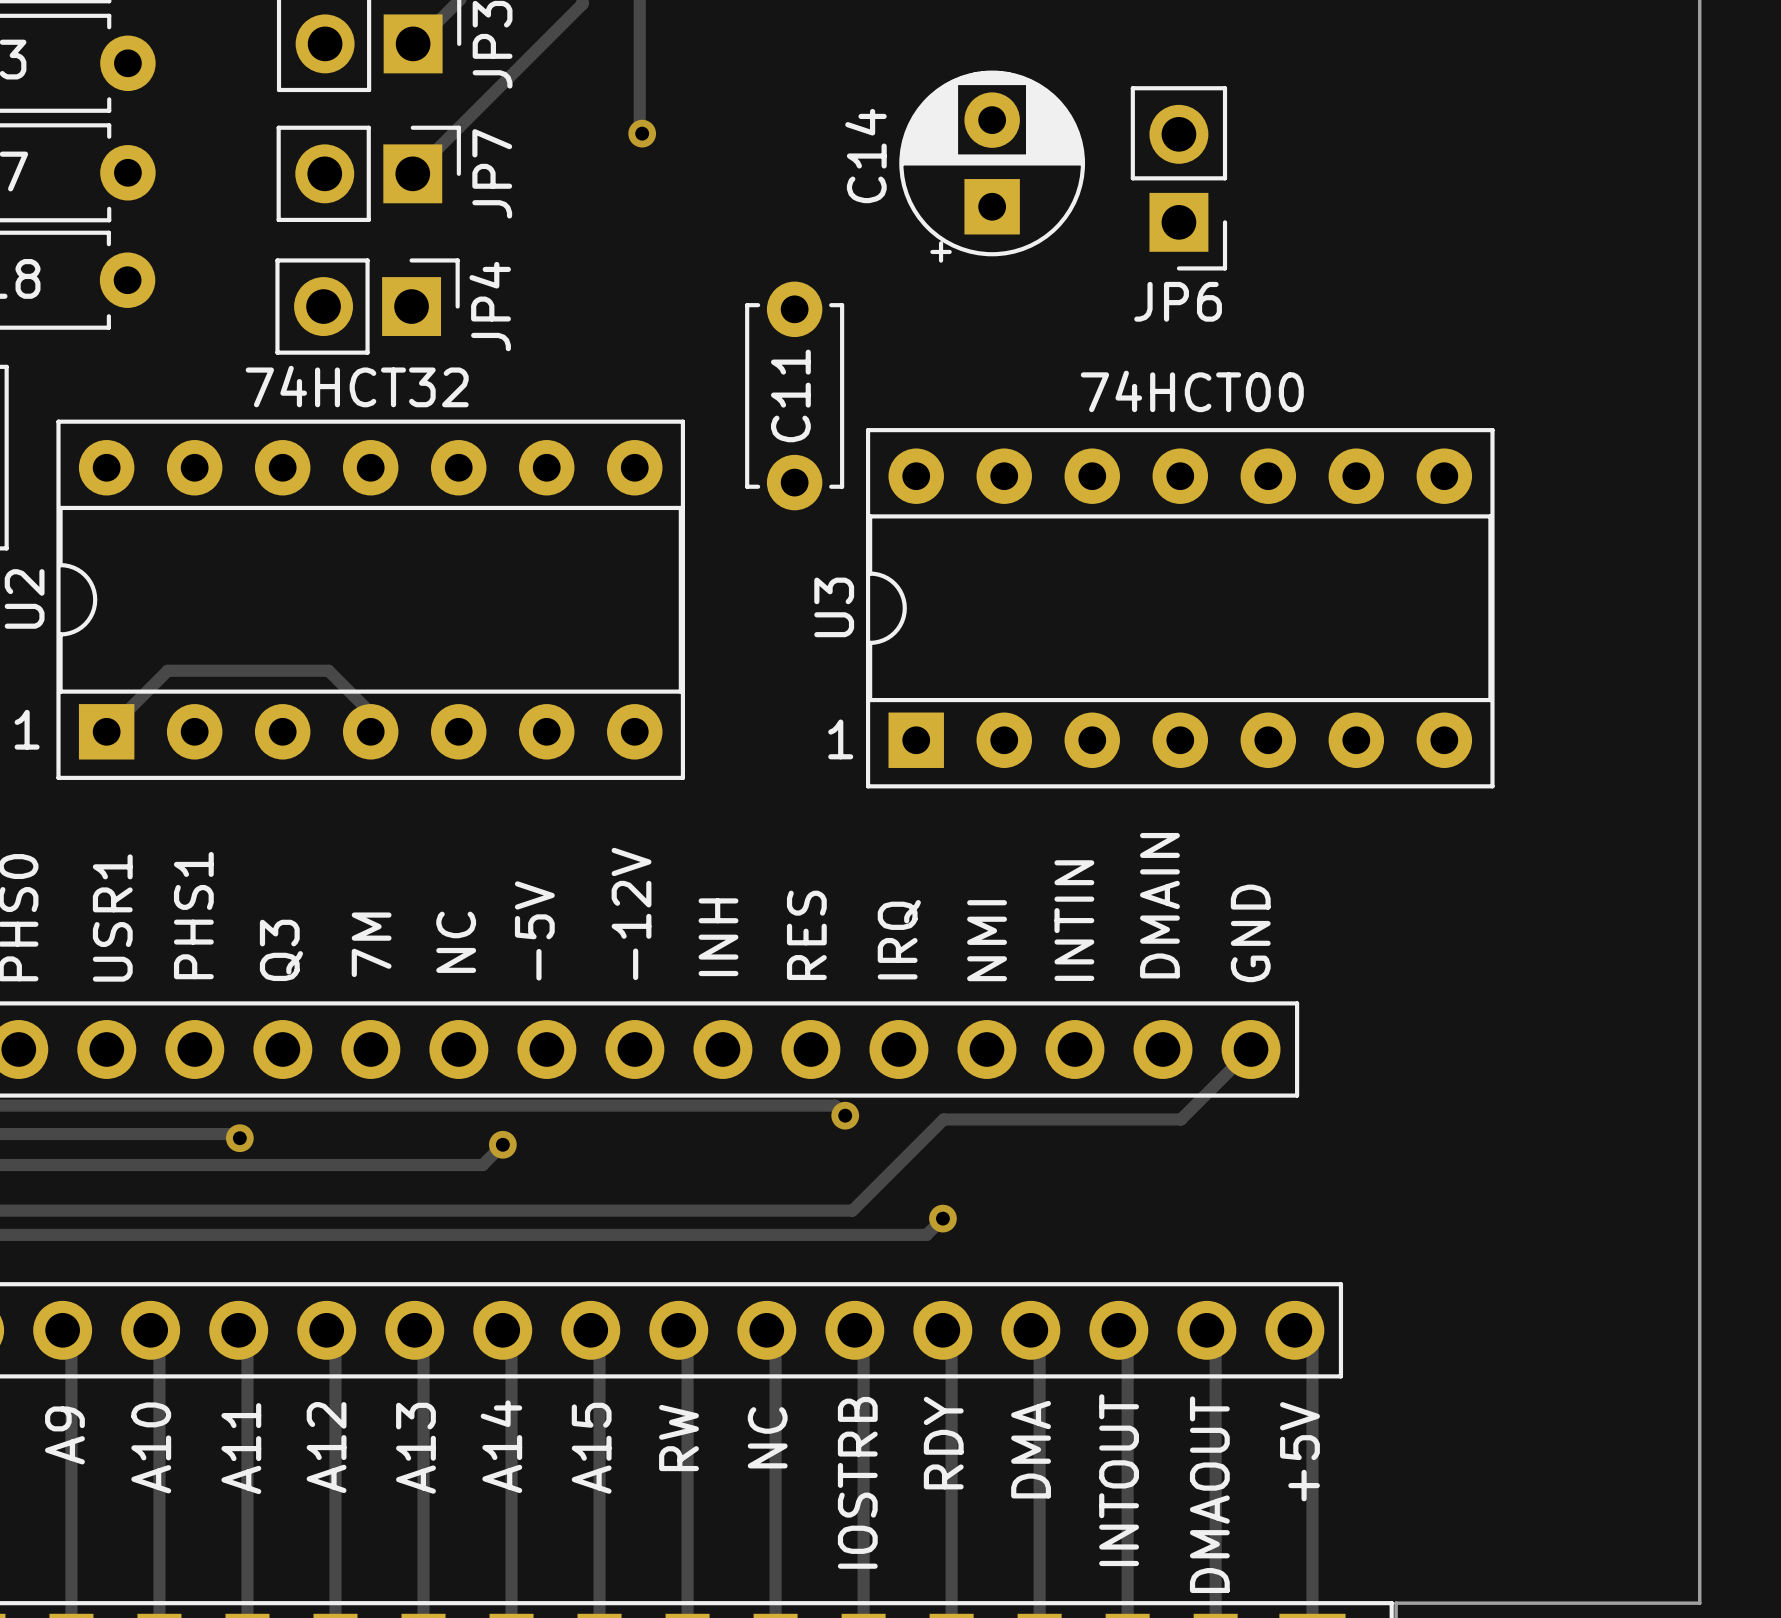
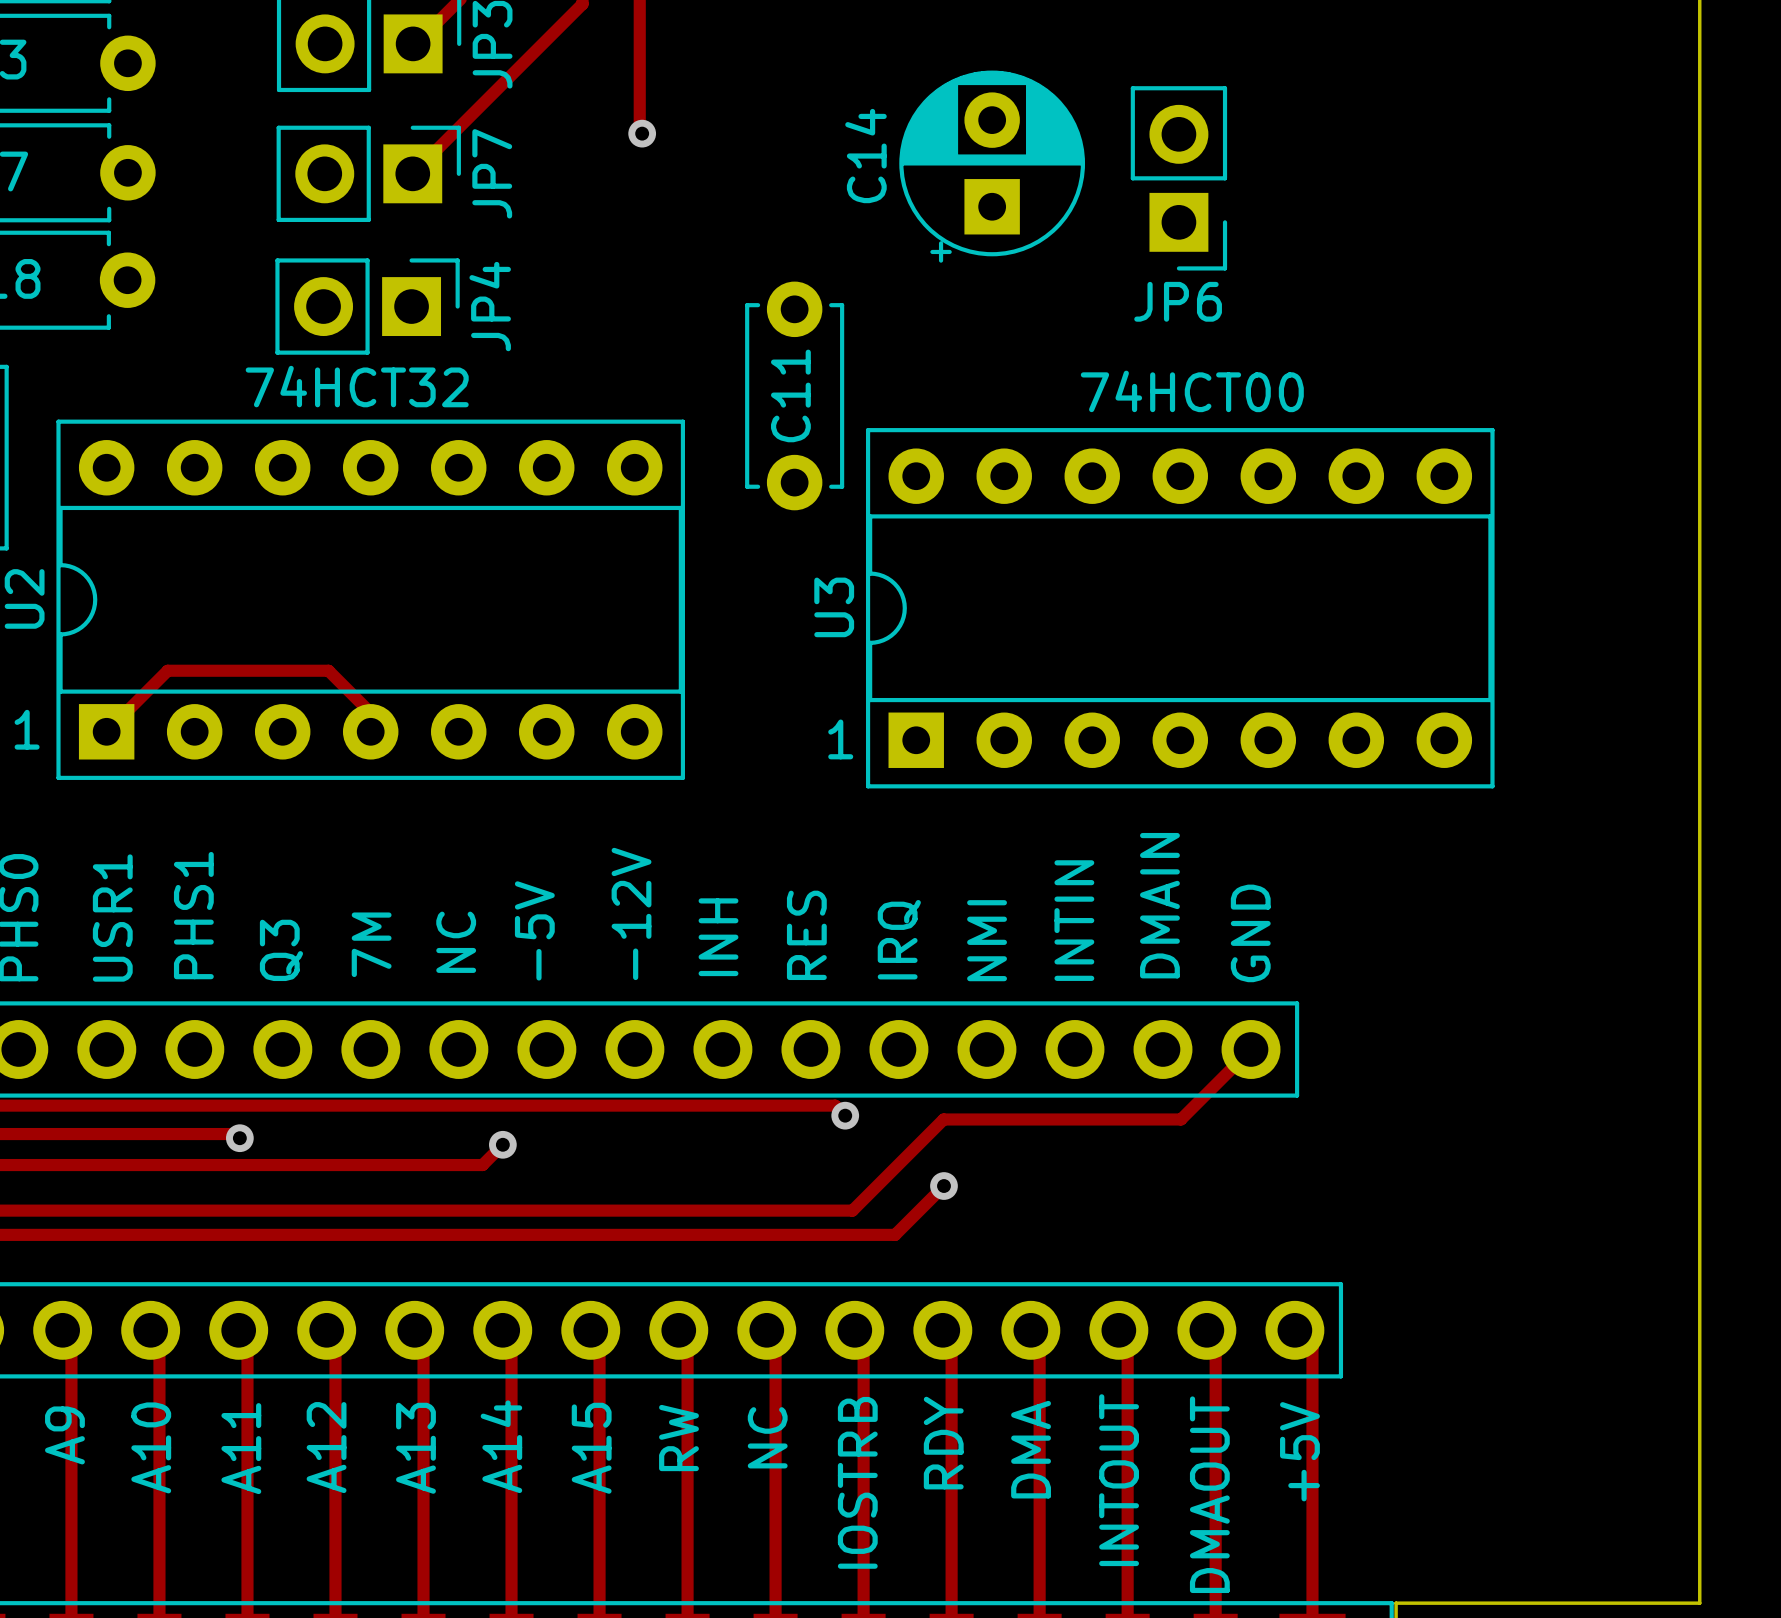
track: (942, 1218) (926, 1234) (895, 1234) -> (943, 1186) (895, 1234)
via position: (942, 1218) -> (943, 1186)

